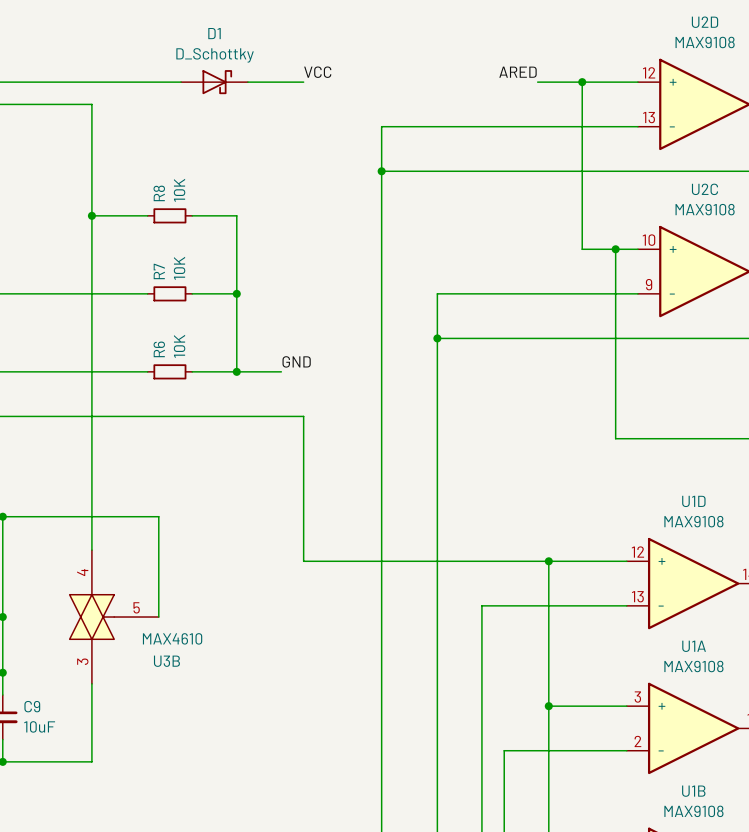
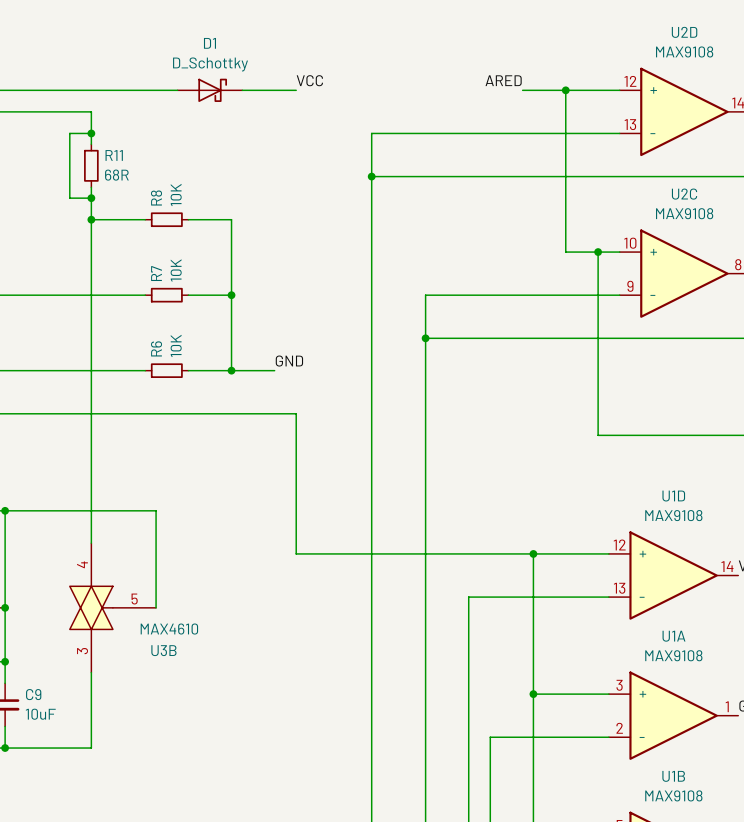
wire: none -> (91, 133) (69, 133) (69, 198) (91, 198)
junction: none -> (91, 133)
wire: (91, 137) (91, 182) -> none
R11: none -> 68R (91, 165)
junction: none -> (91, 198)

